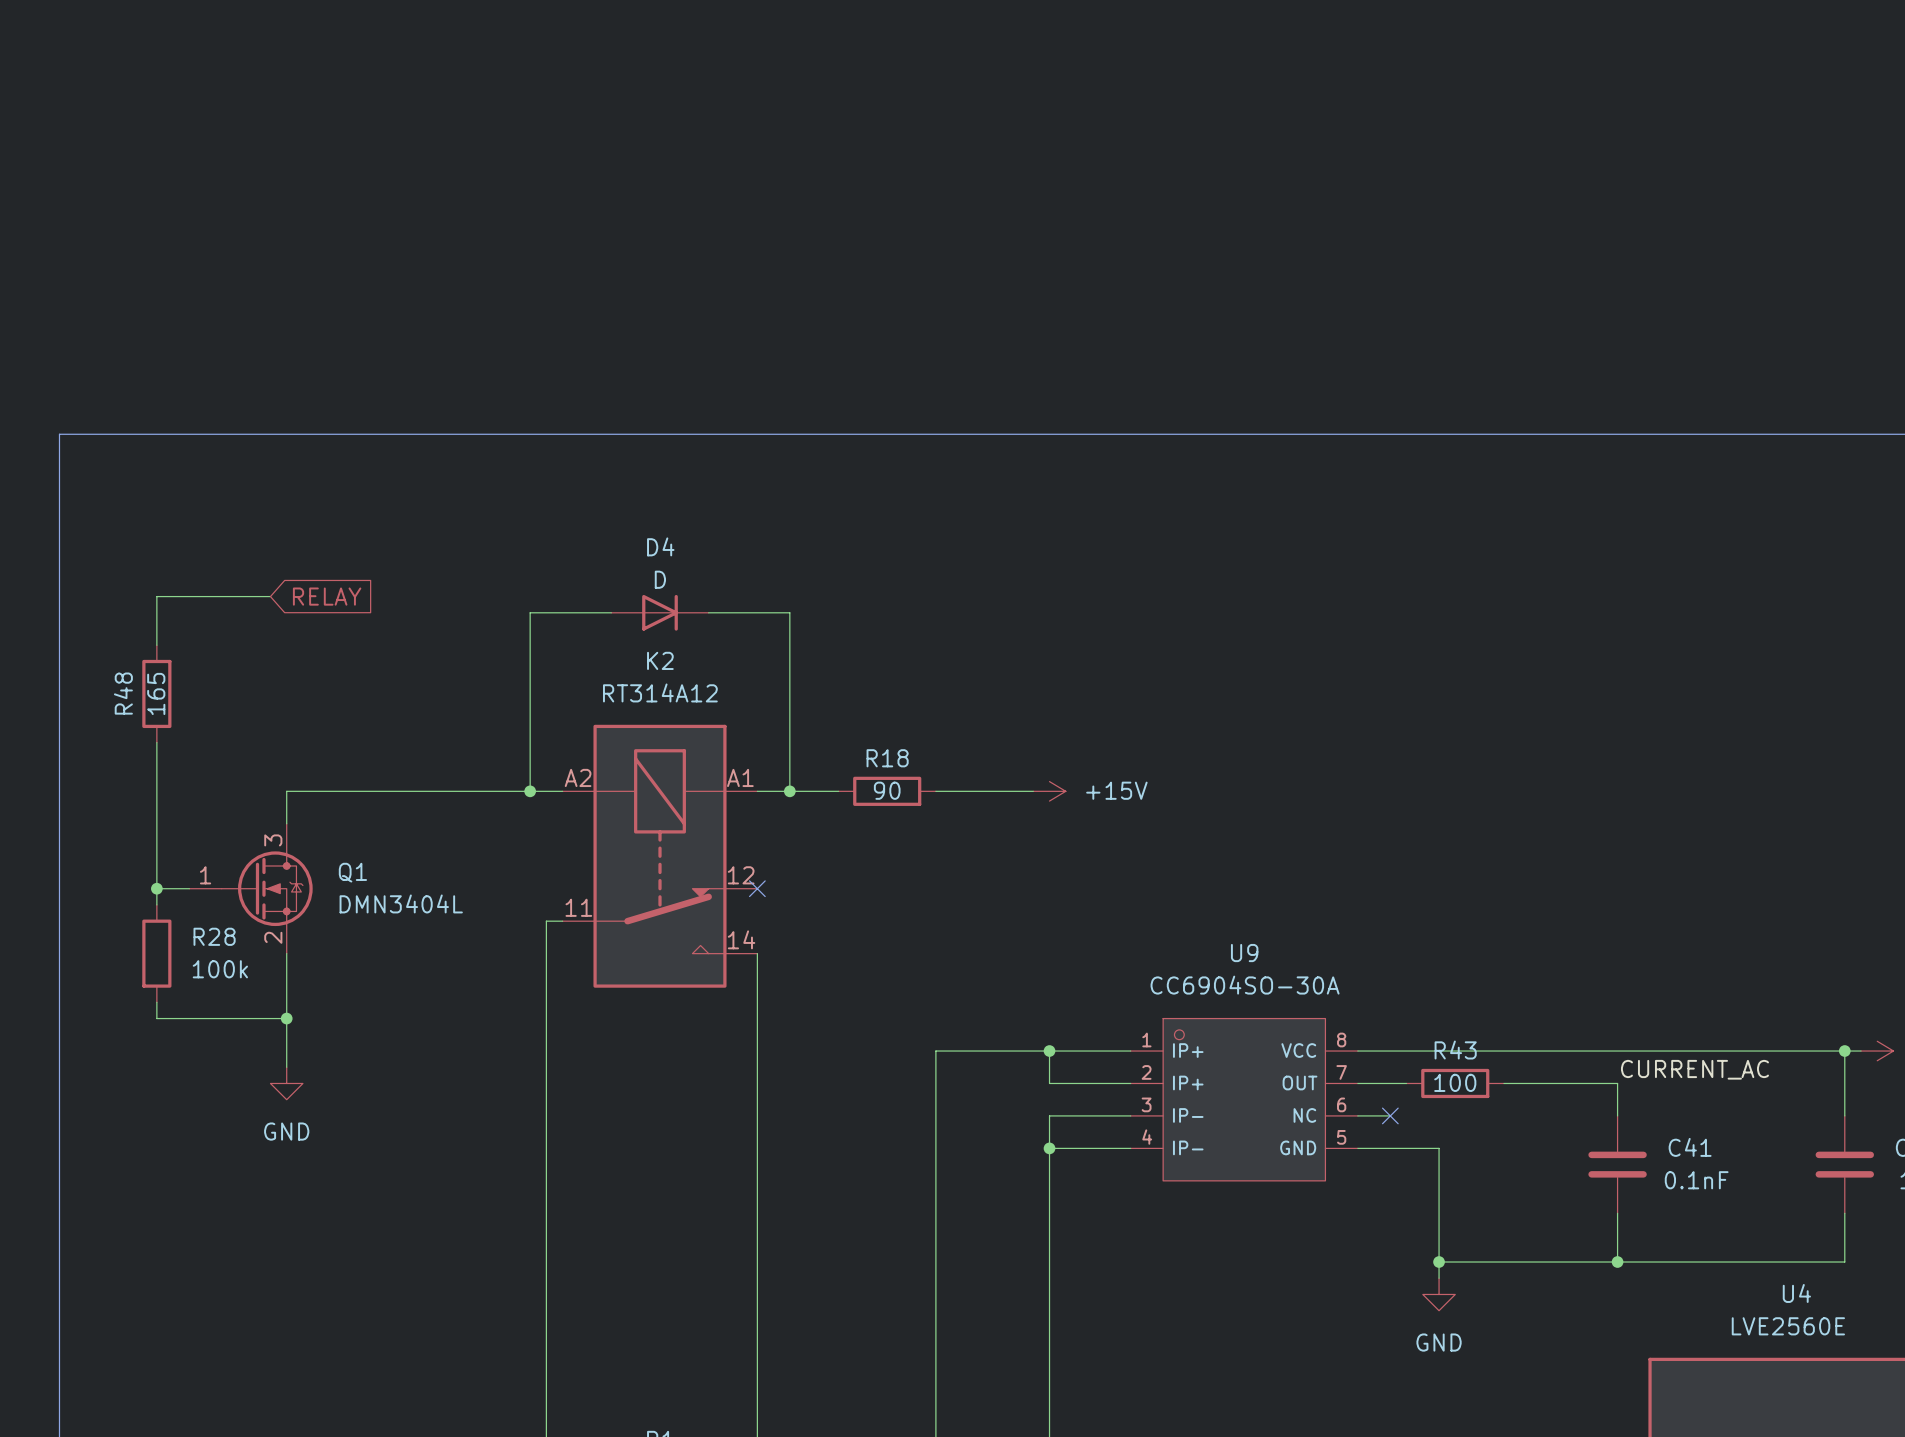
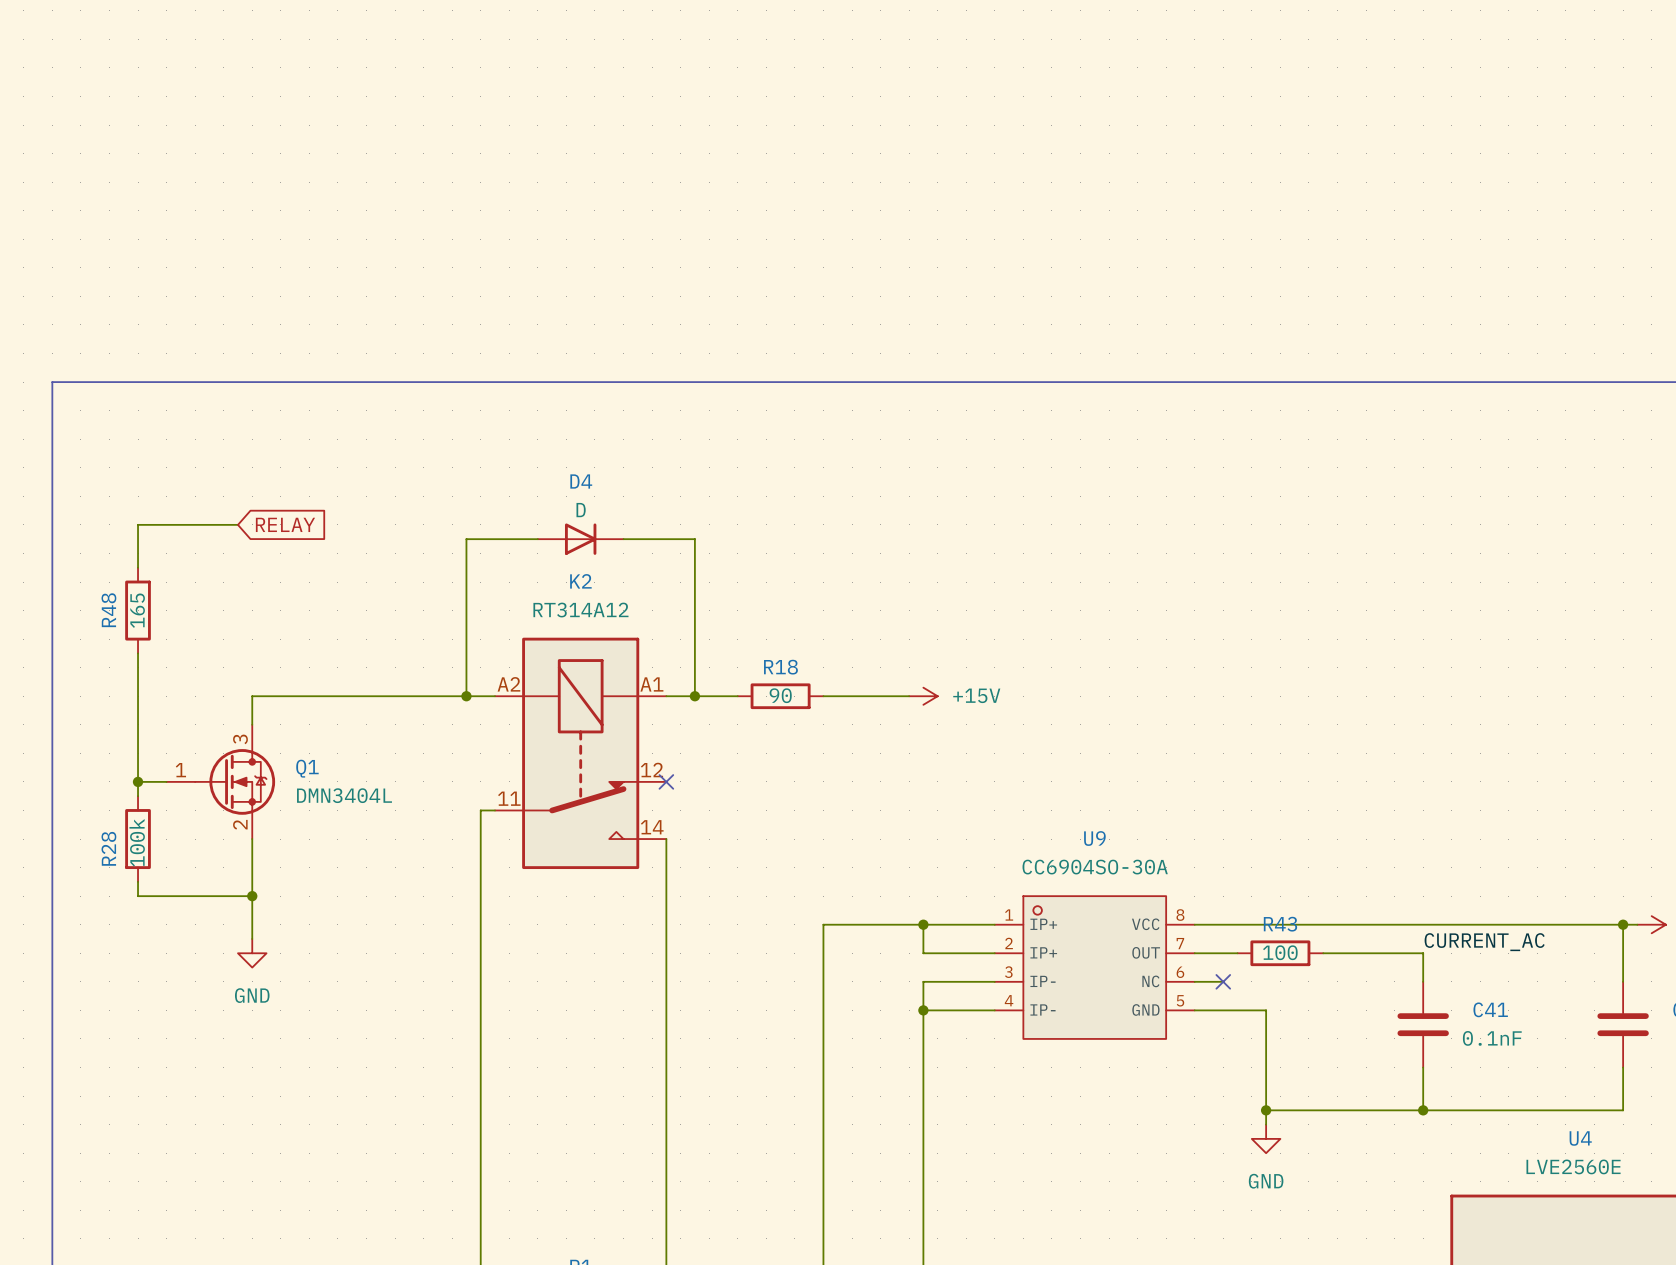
R28 name rotation: 0° (214, 936) -> 90° counterclockwise (108, 848)
R28 name position: R28 (214, 936) -> R28 (108, 848)
R28 value rotation: 0° (220, 969) -> 90° counterclockwise (137, 842)

